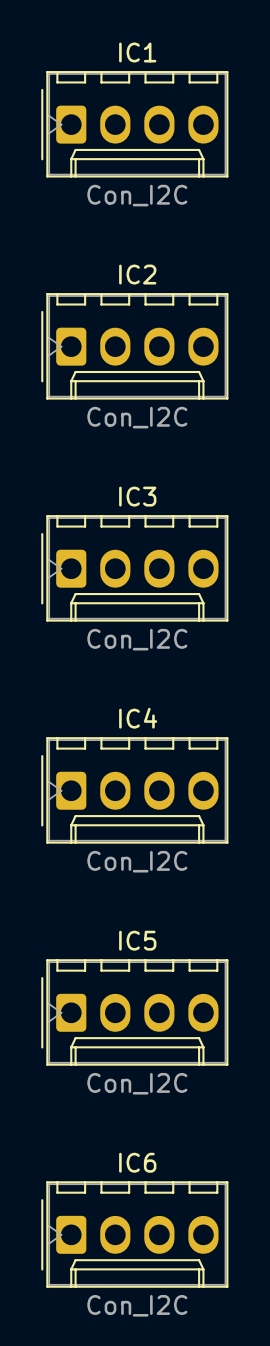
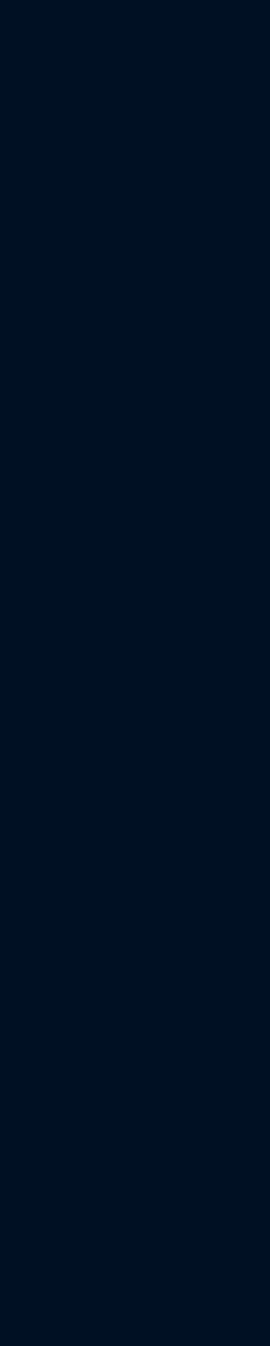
IC1: Con_I2C (134, 124) -> none
IC2: Con_I2C (134, 346) -> none
IC3: Con_I2C (134, 568) -> none
IC4: Con_I2C (134, 790) -> none
IC5: Con_I2C (134, 1012) -> none
IC6: Con_I2C (134, 1234) -> none

